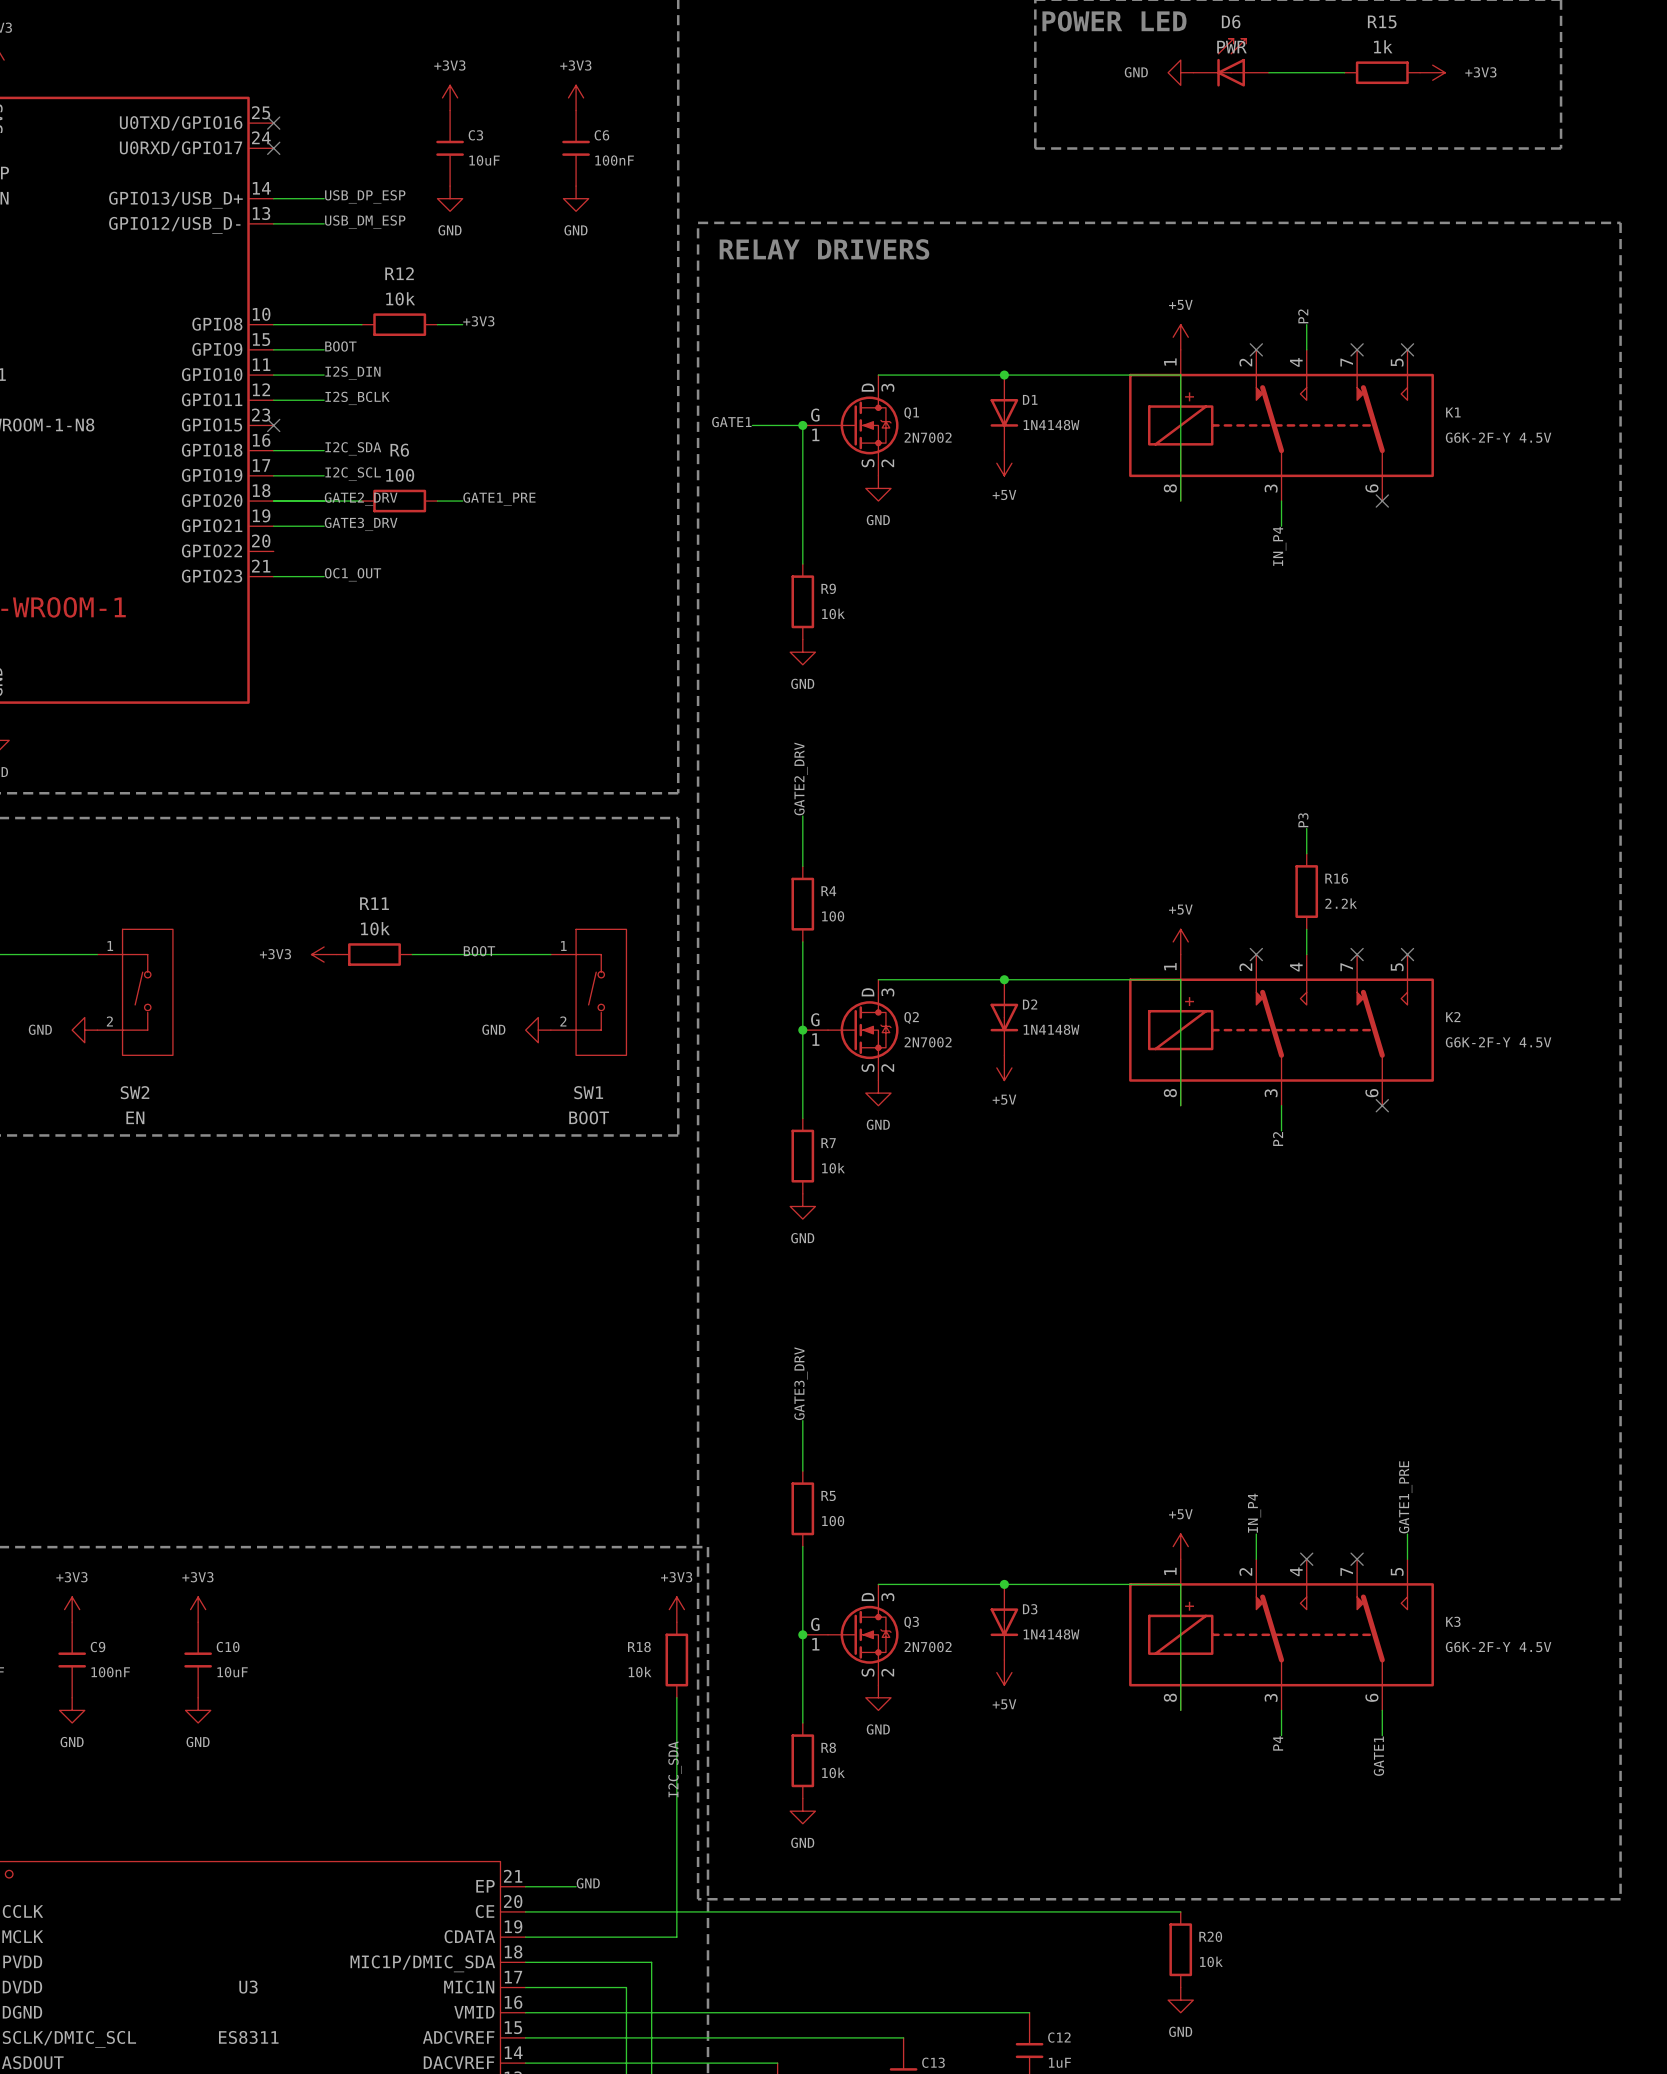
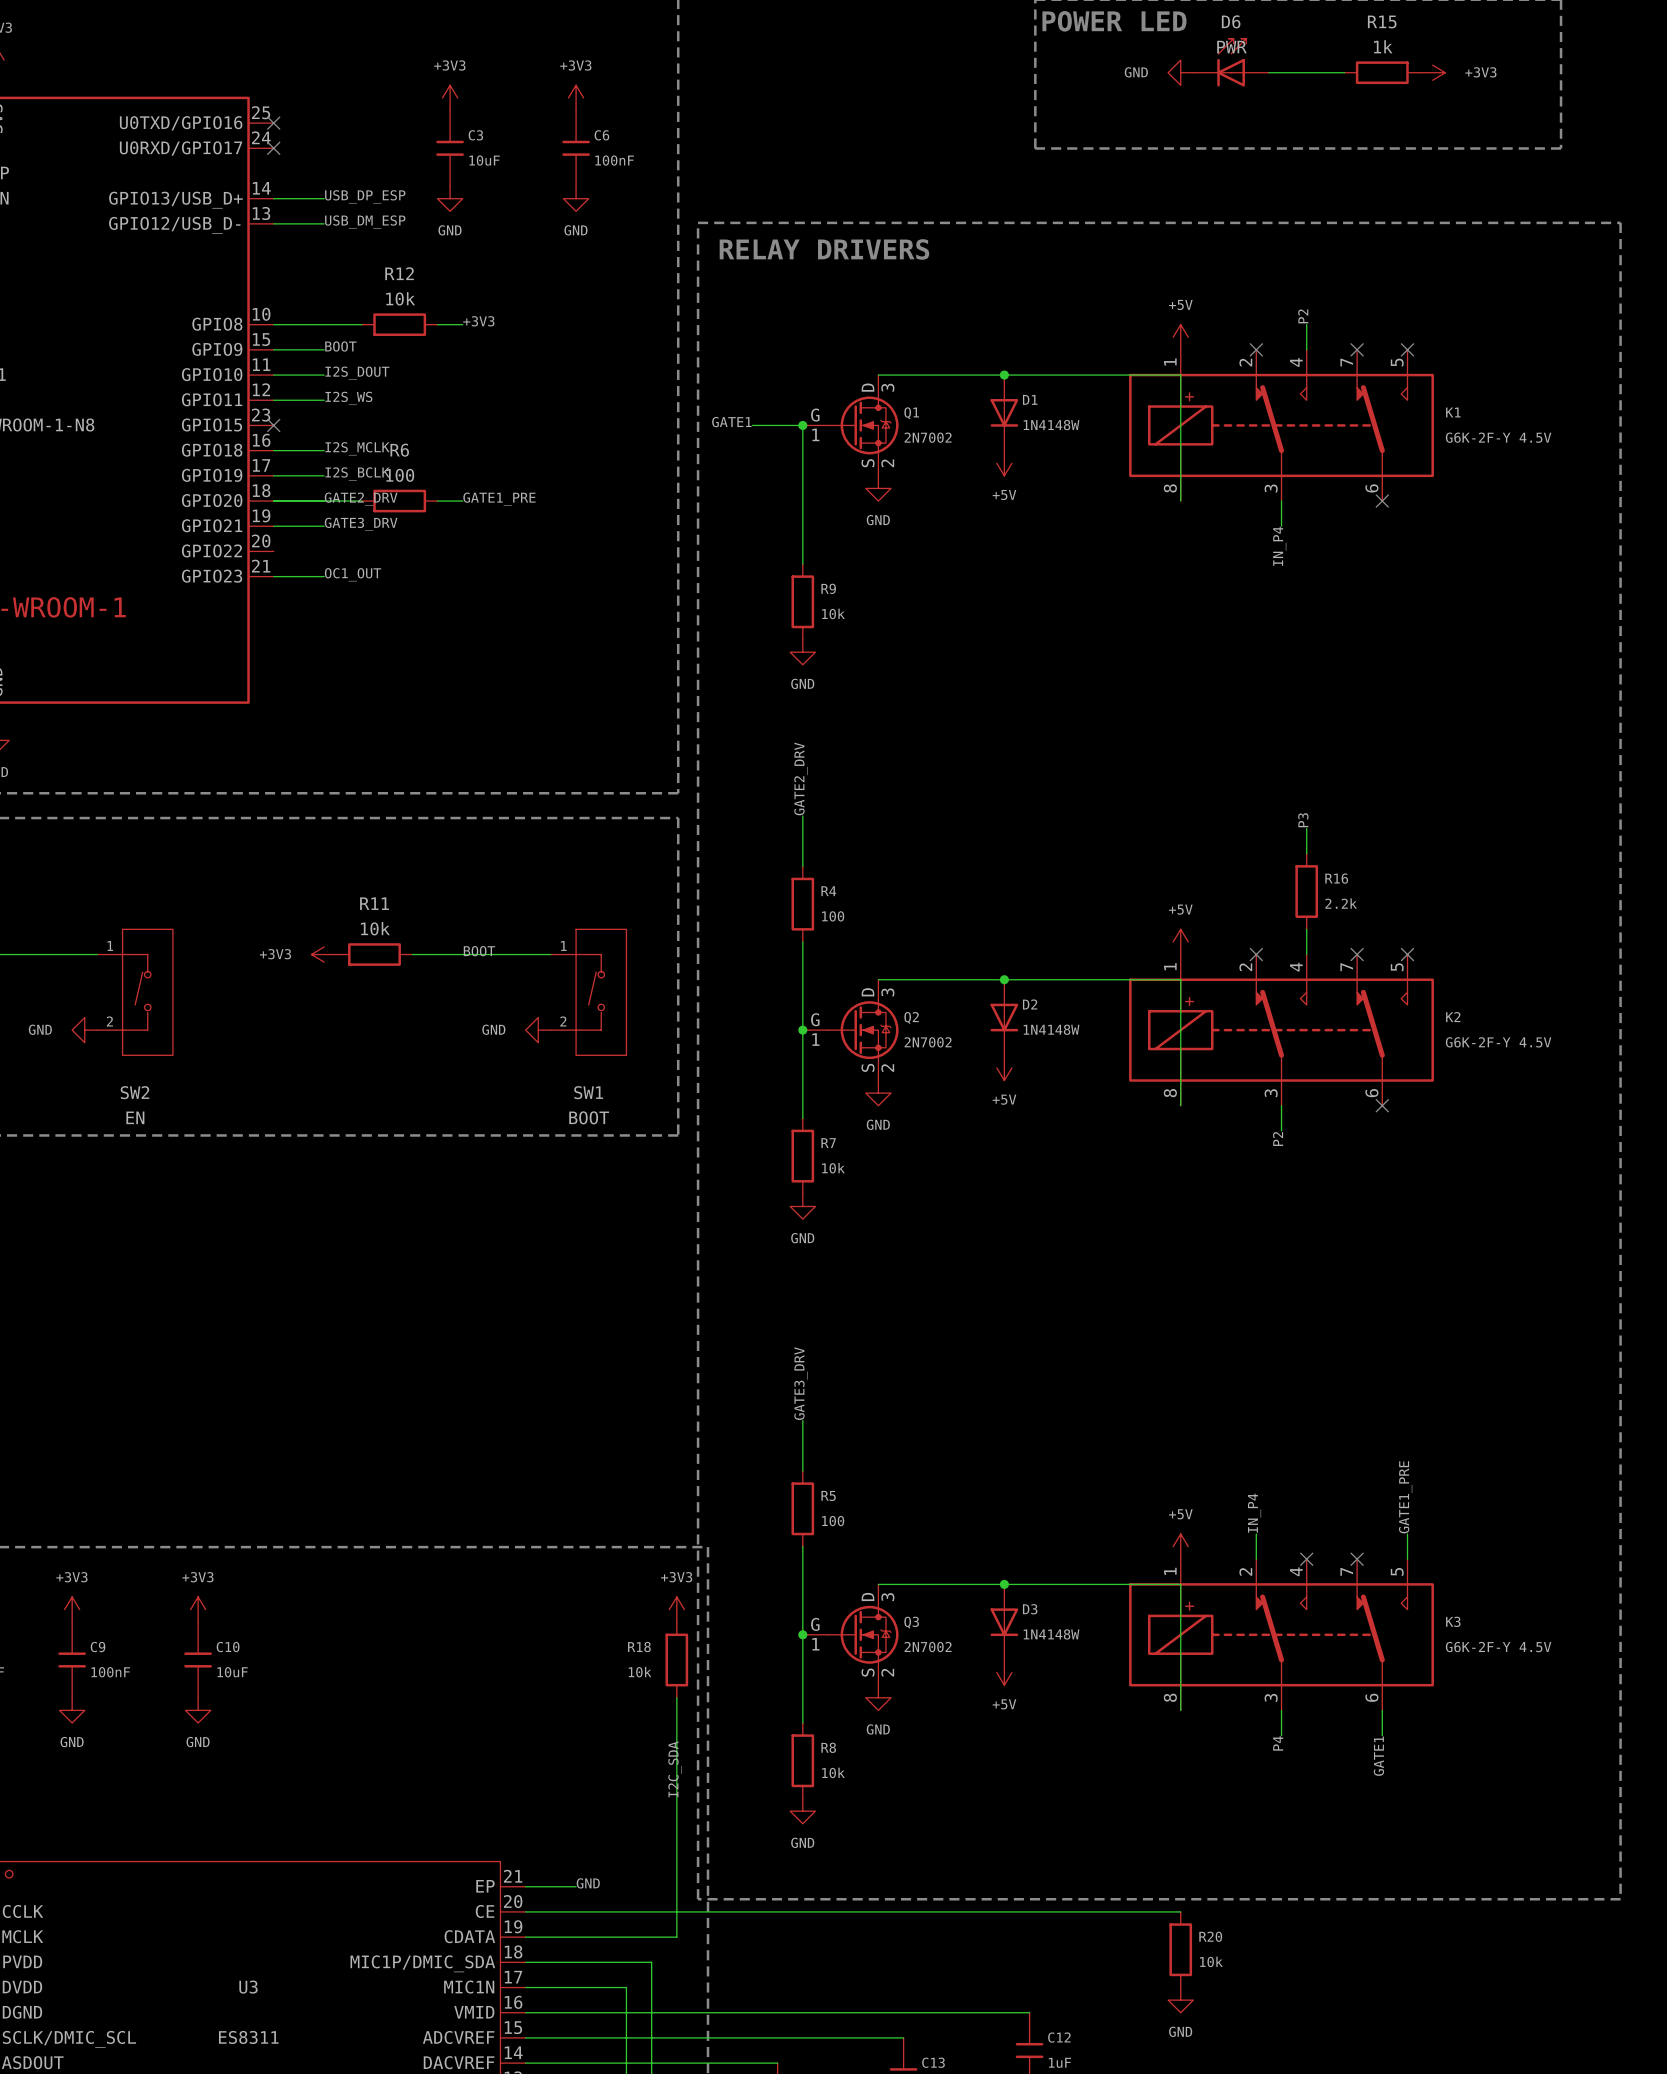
label: I2S_DIN (352, 373) -> I2S_DOUT (357, 373)
label: I2S_BCLK (357, 398) -> I2S_WS (348, 398)
label: I2C_SDA (353, 448) -> I2S_MCLK (357, 448)
label: I2C_SCL (353, 473) -> I2S_BCLK (357, 473)

